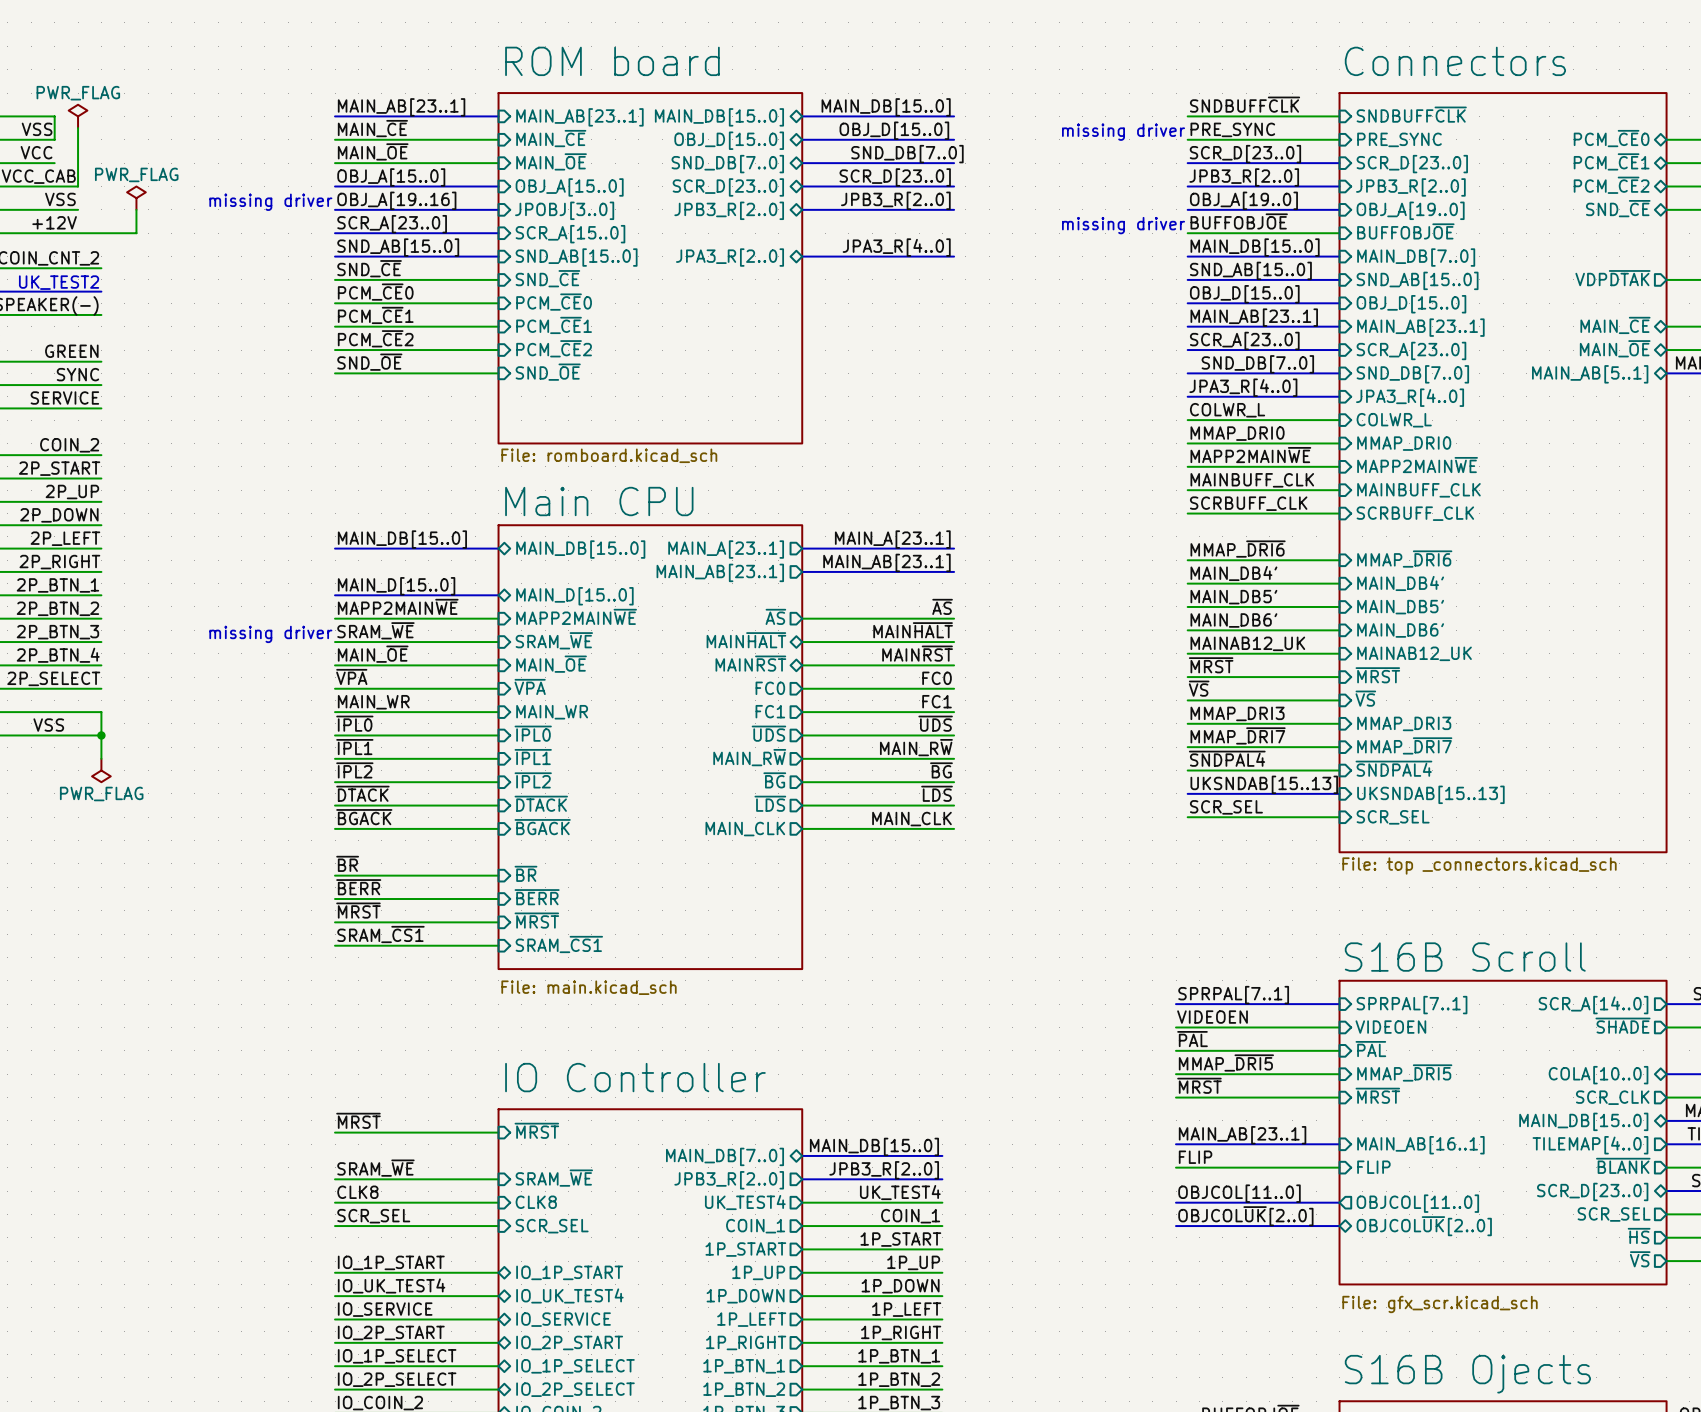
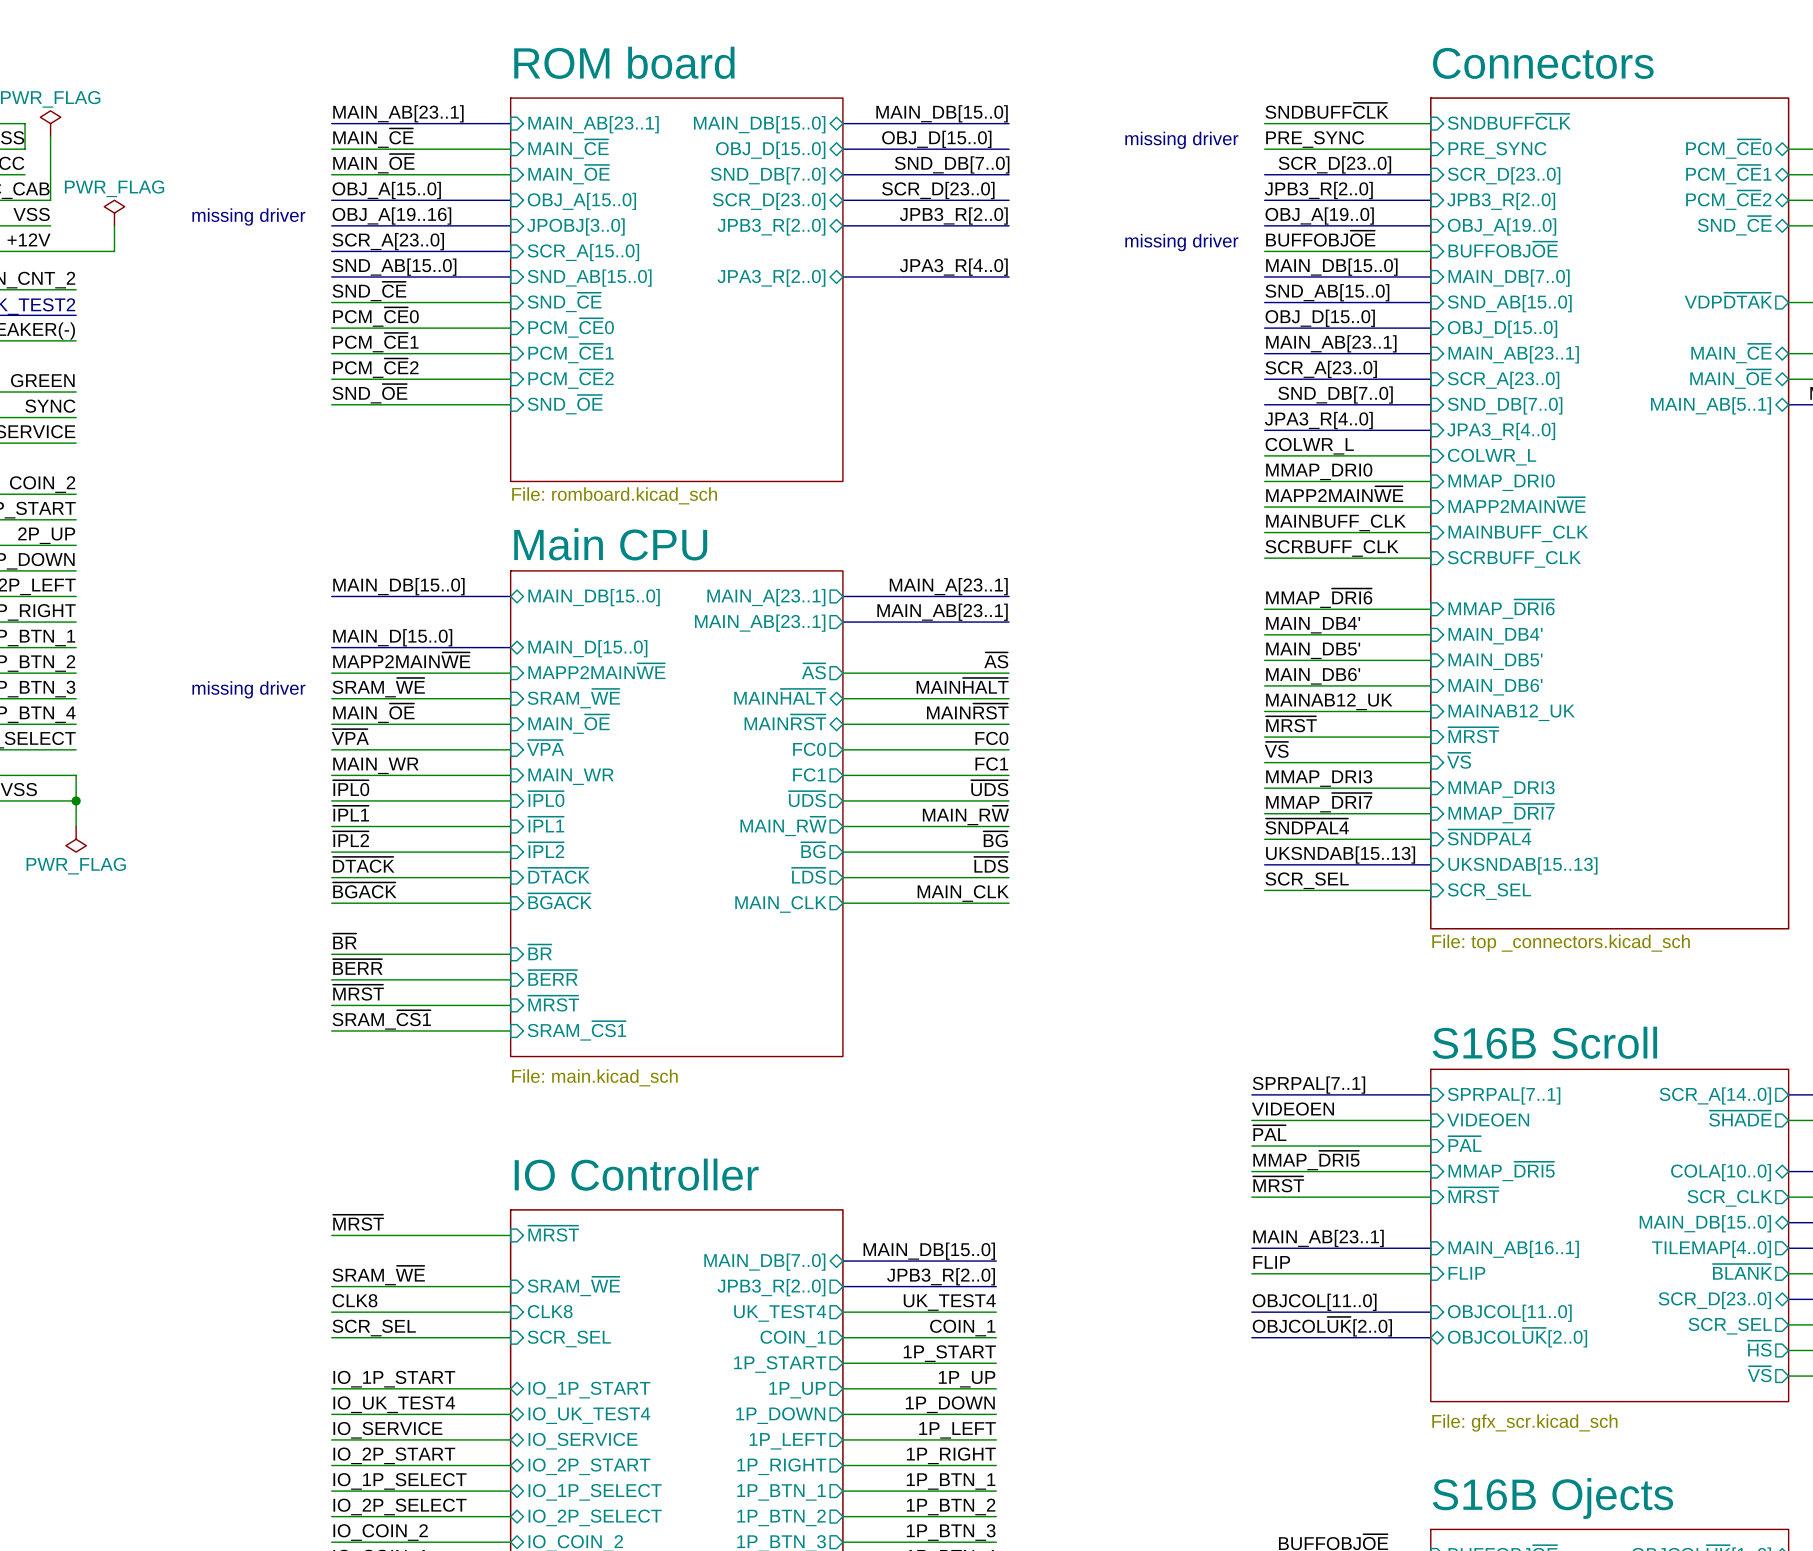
sheet pin shape: output (1417, 1203) -> input (1509, 1313)

